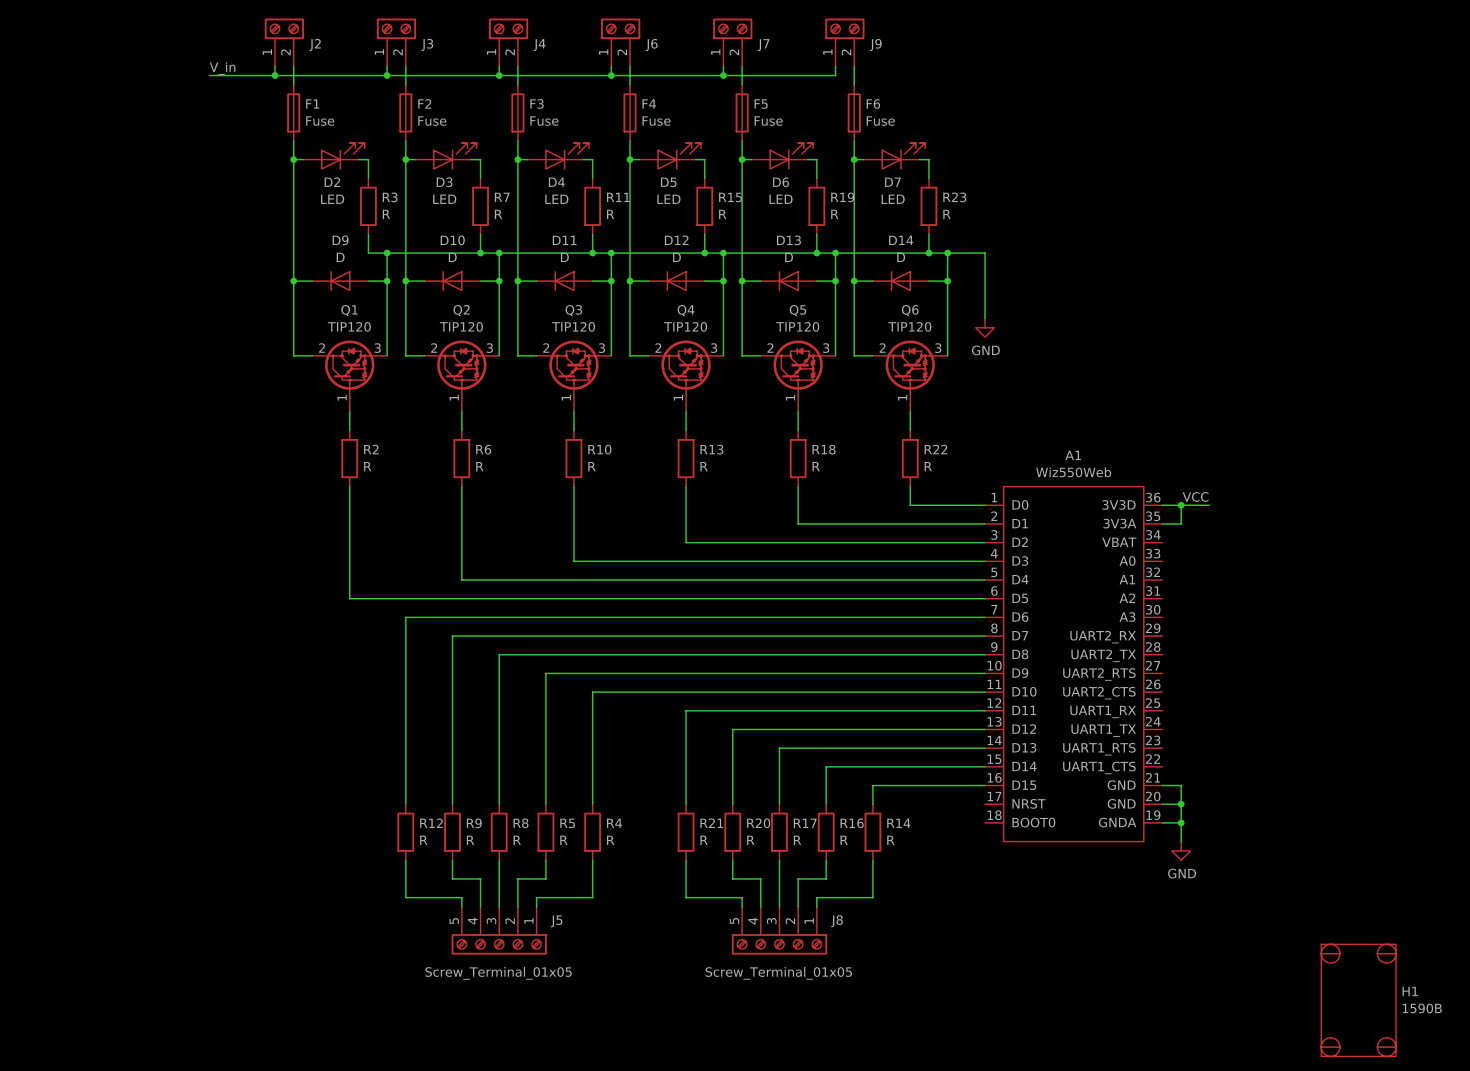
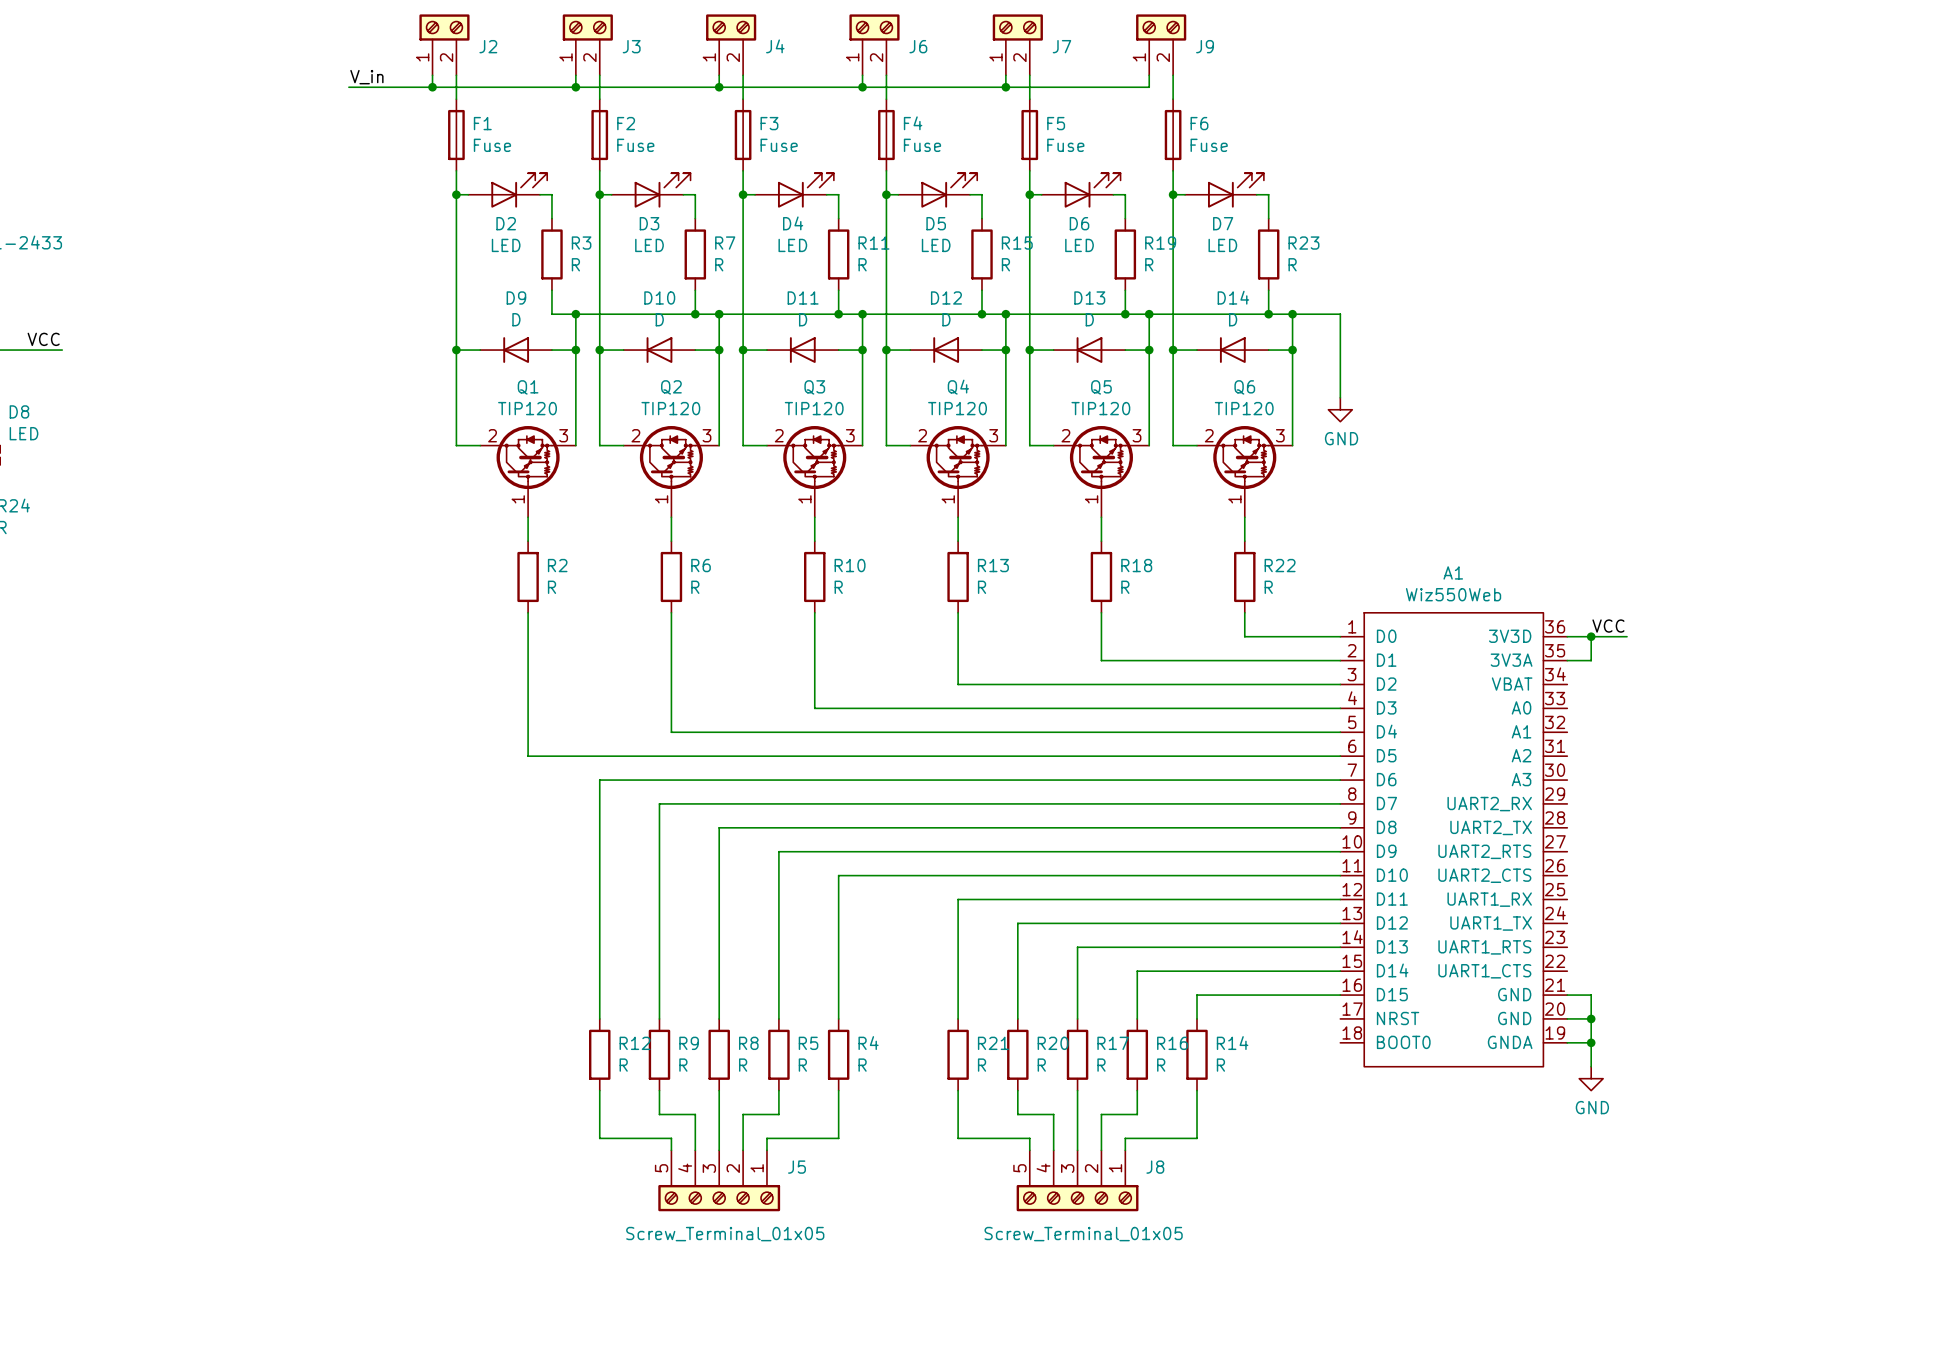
H1: 1590B (1358, 1000) -> none

